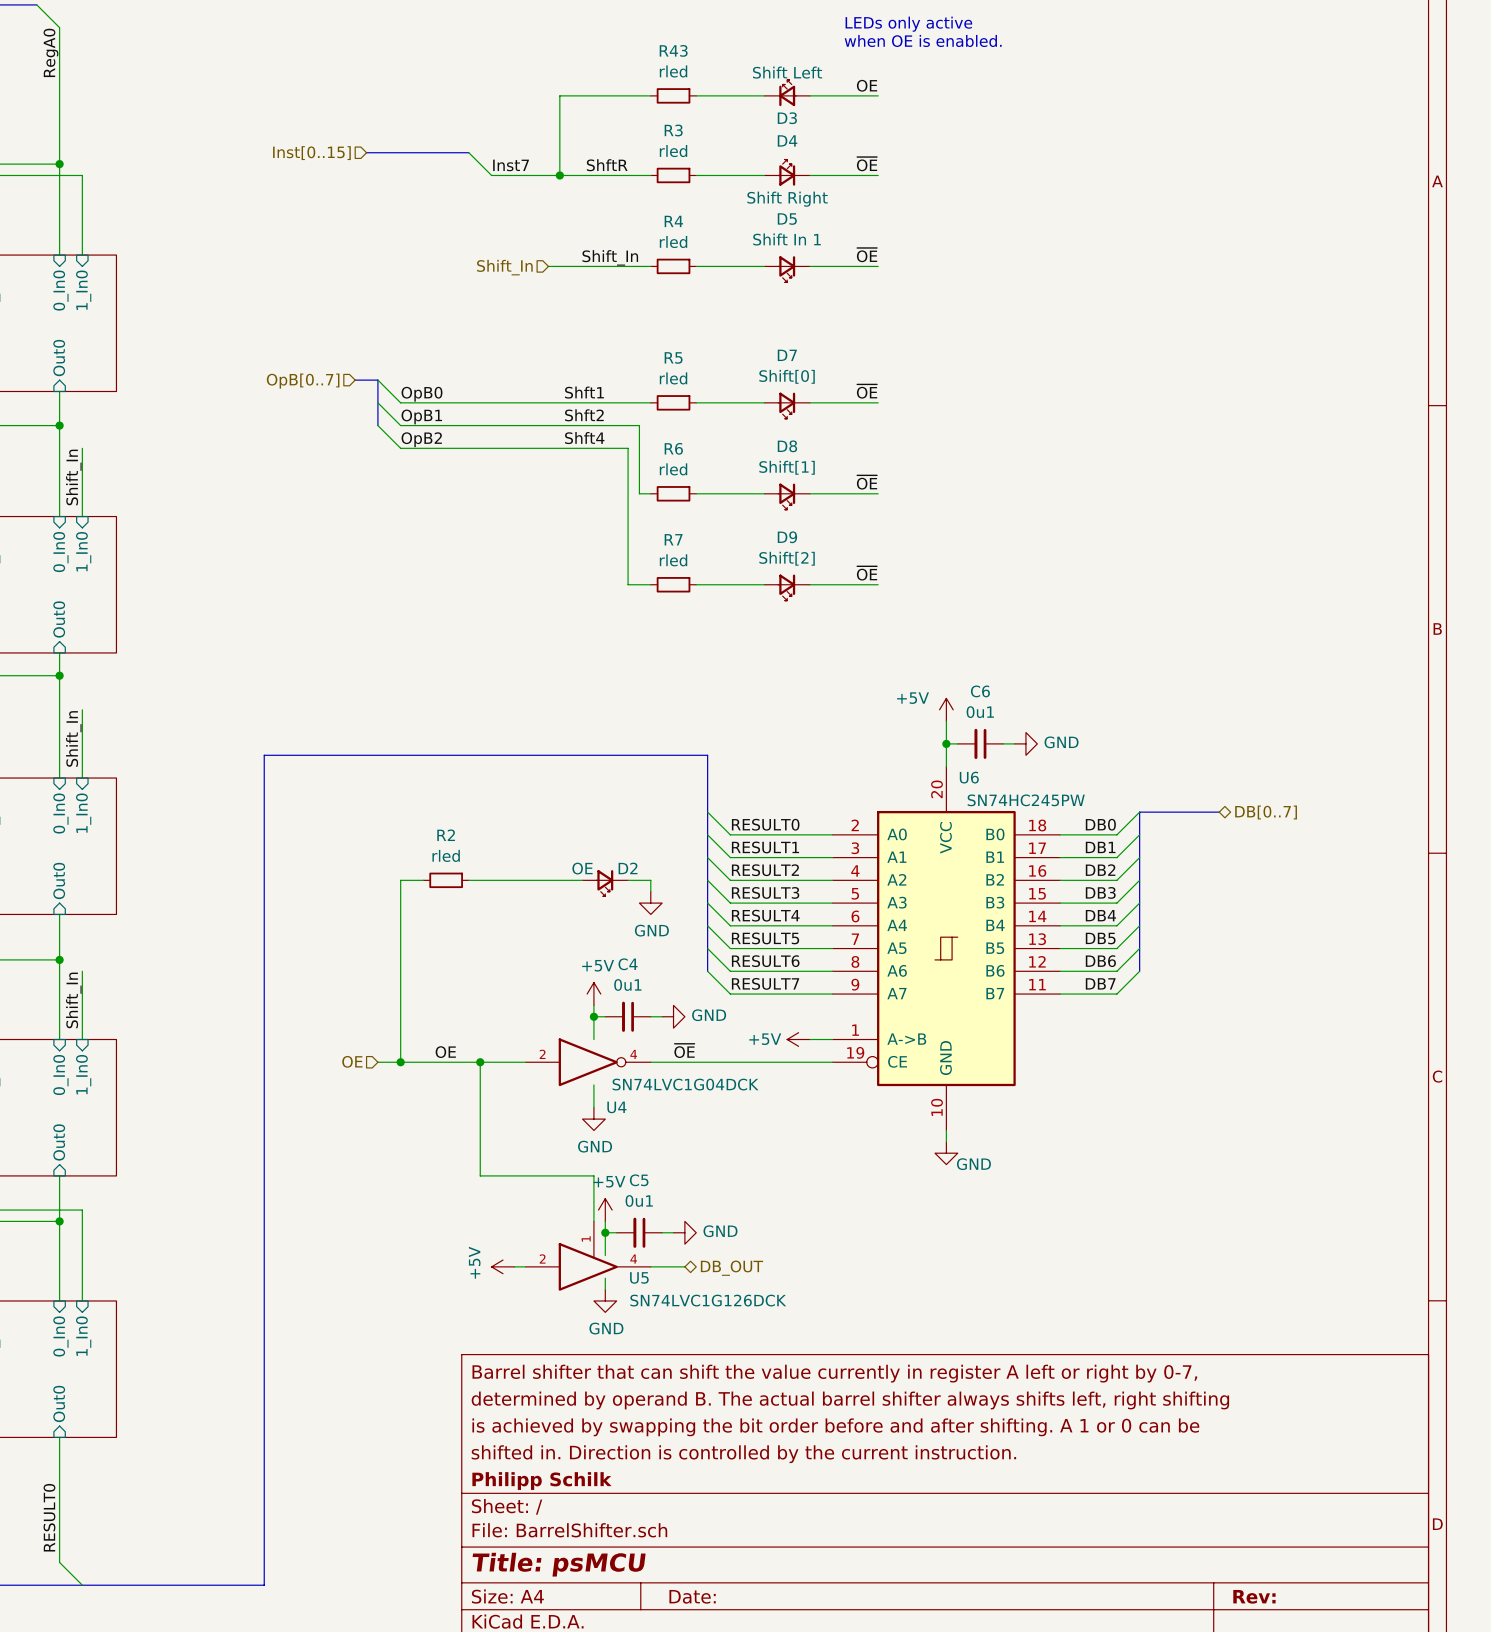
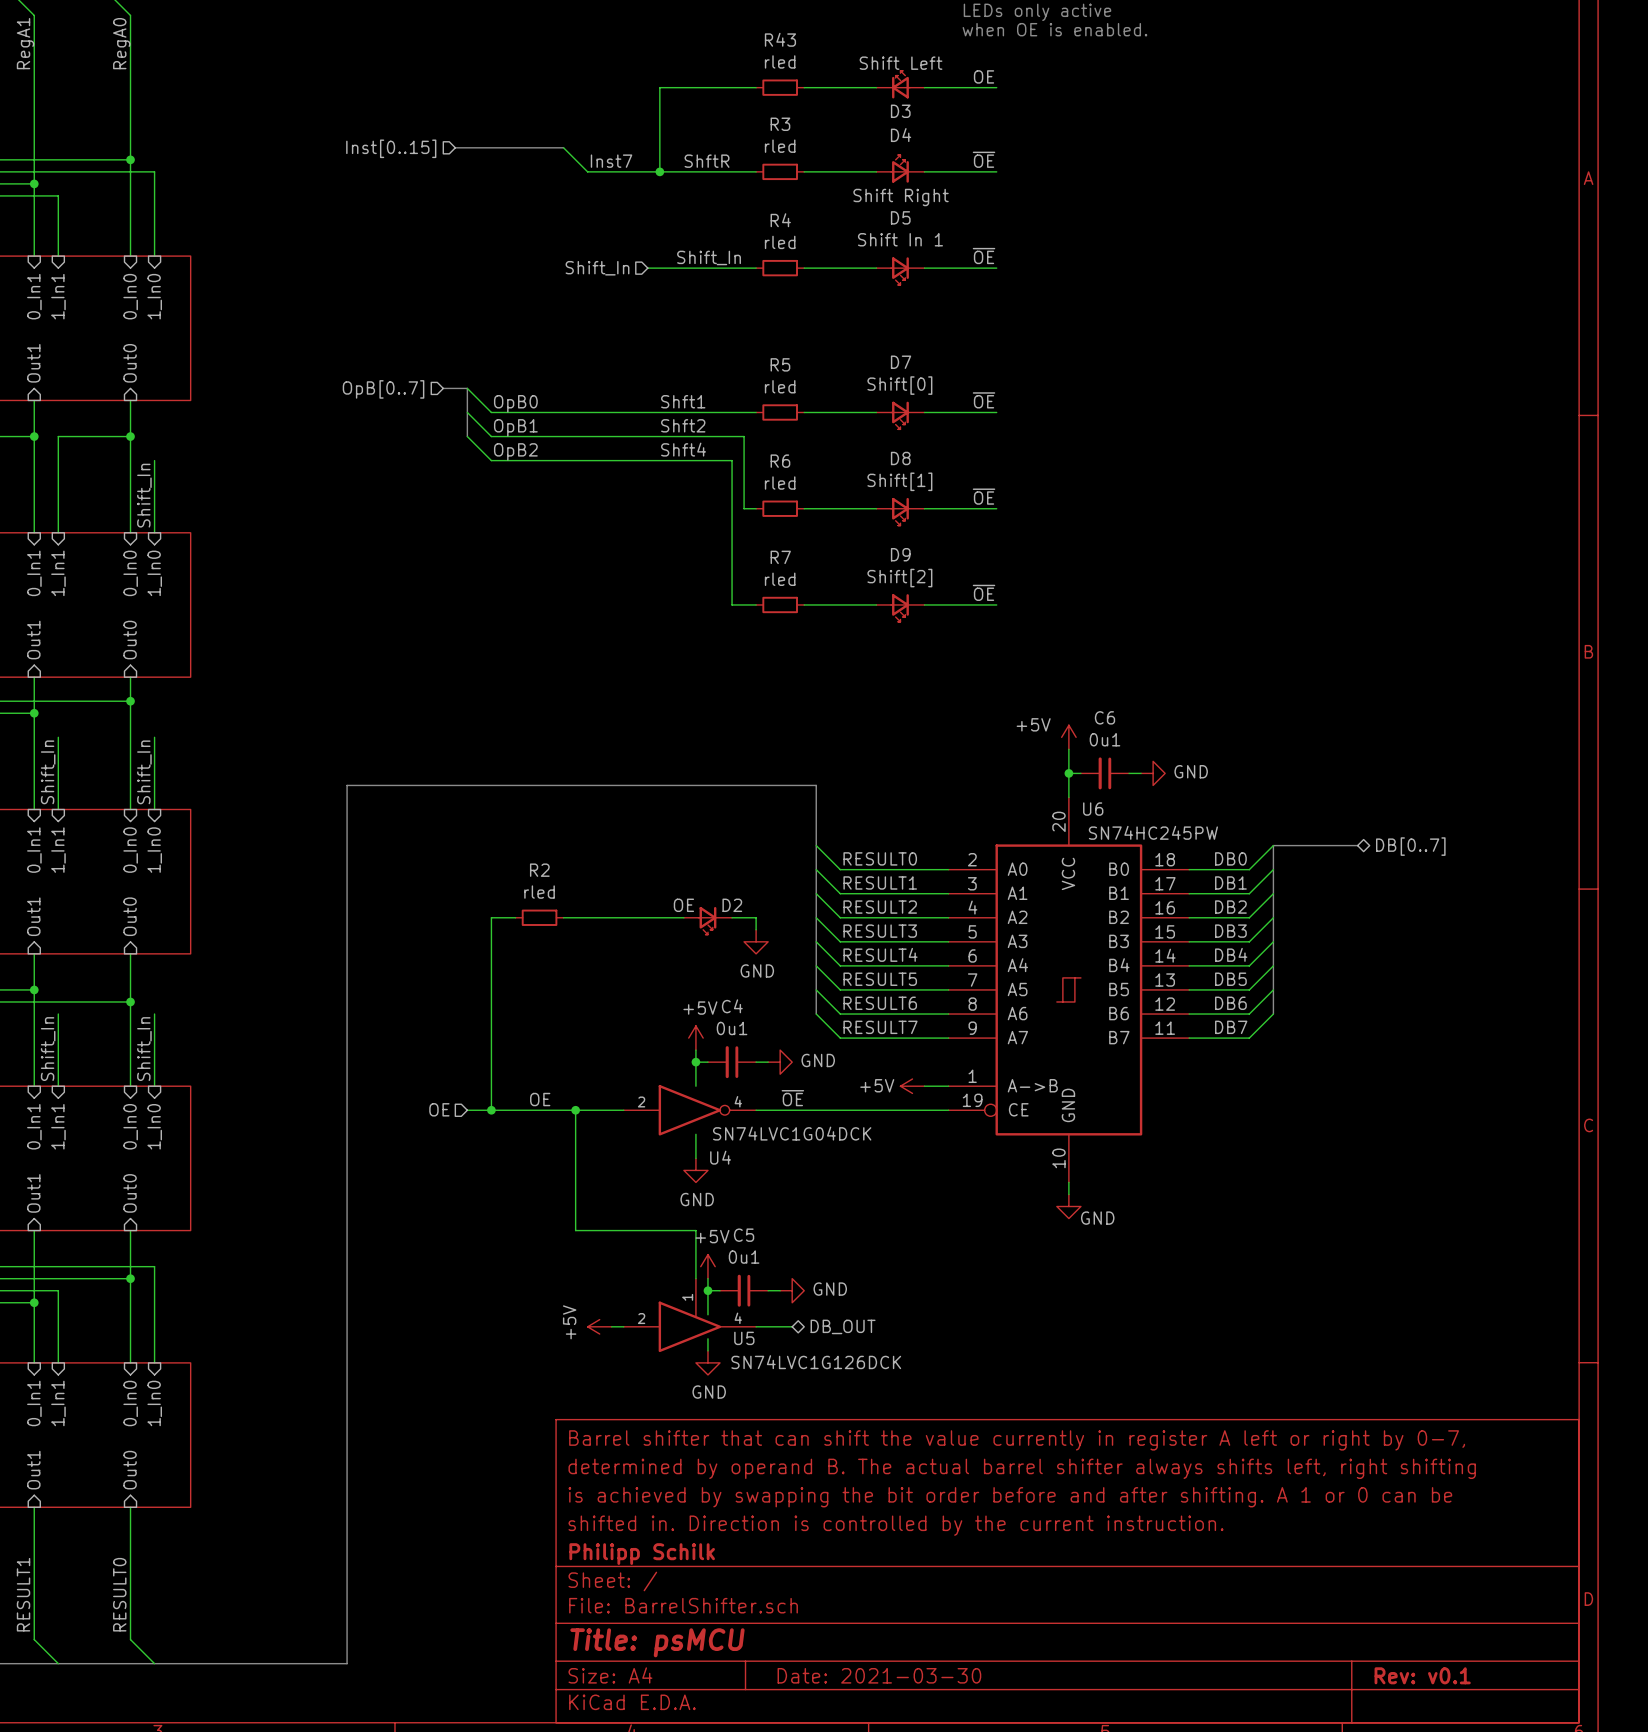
title block: Date: (692, 1596) -> Date: 2021-03-30 (879, 1675)
title block: Rev: (1254, 1596) -> Rev: v0.1 (1422, 1675)

